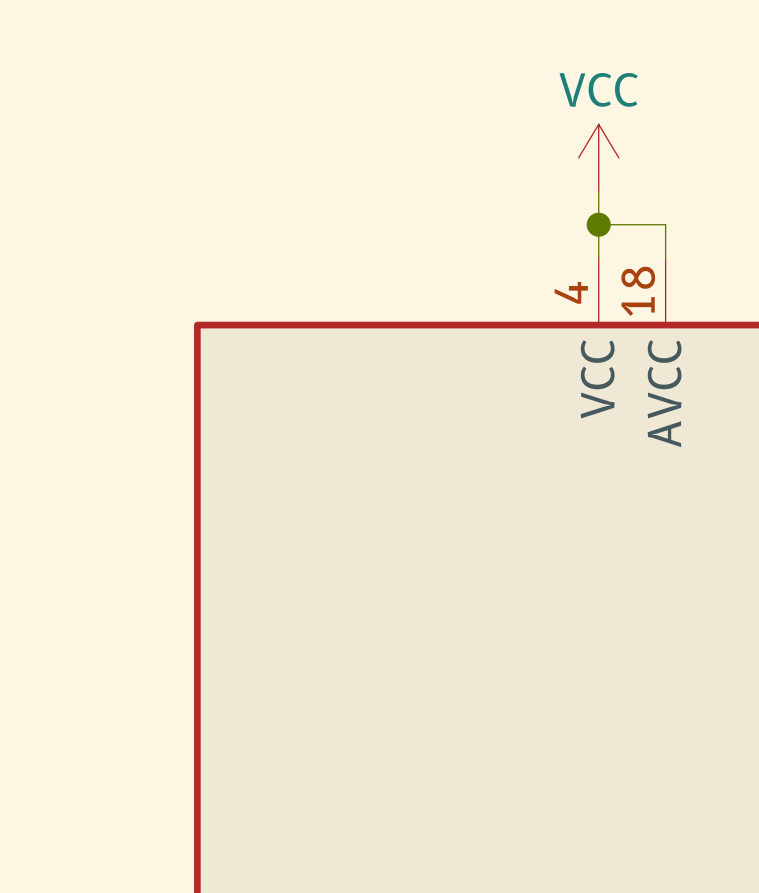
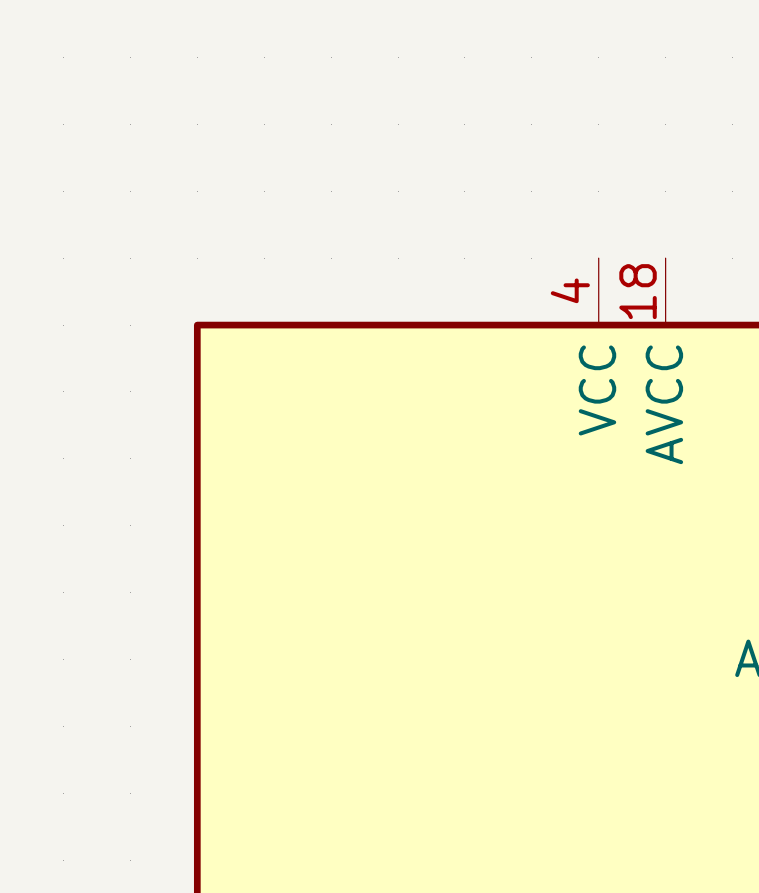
power symbol: VCC (598, 157) -> none
wire: (598, 191) (598, 258) -> none
wire: (598, 224) (665, 224) (665, 258) -> none
junction: (598, 224) -> none

